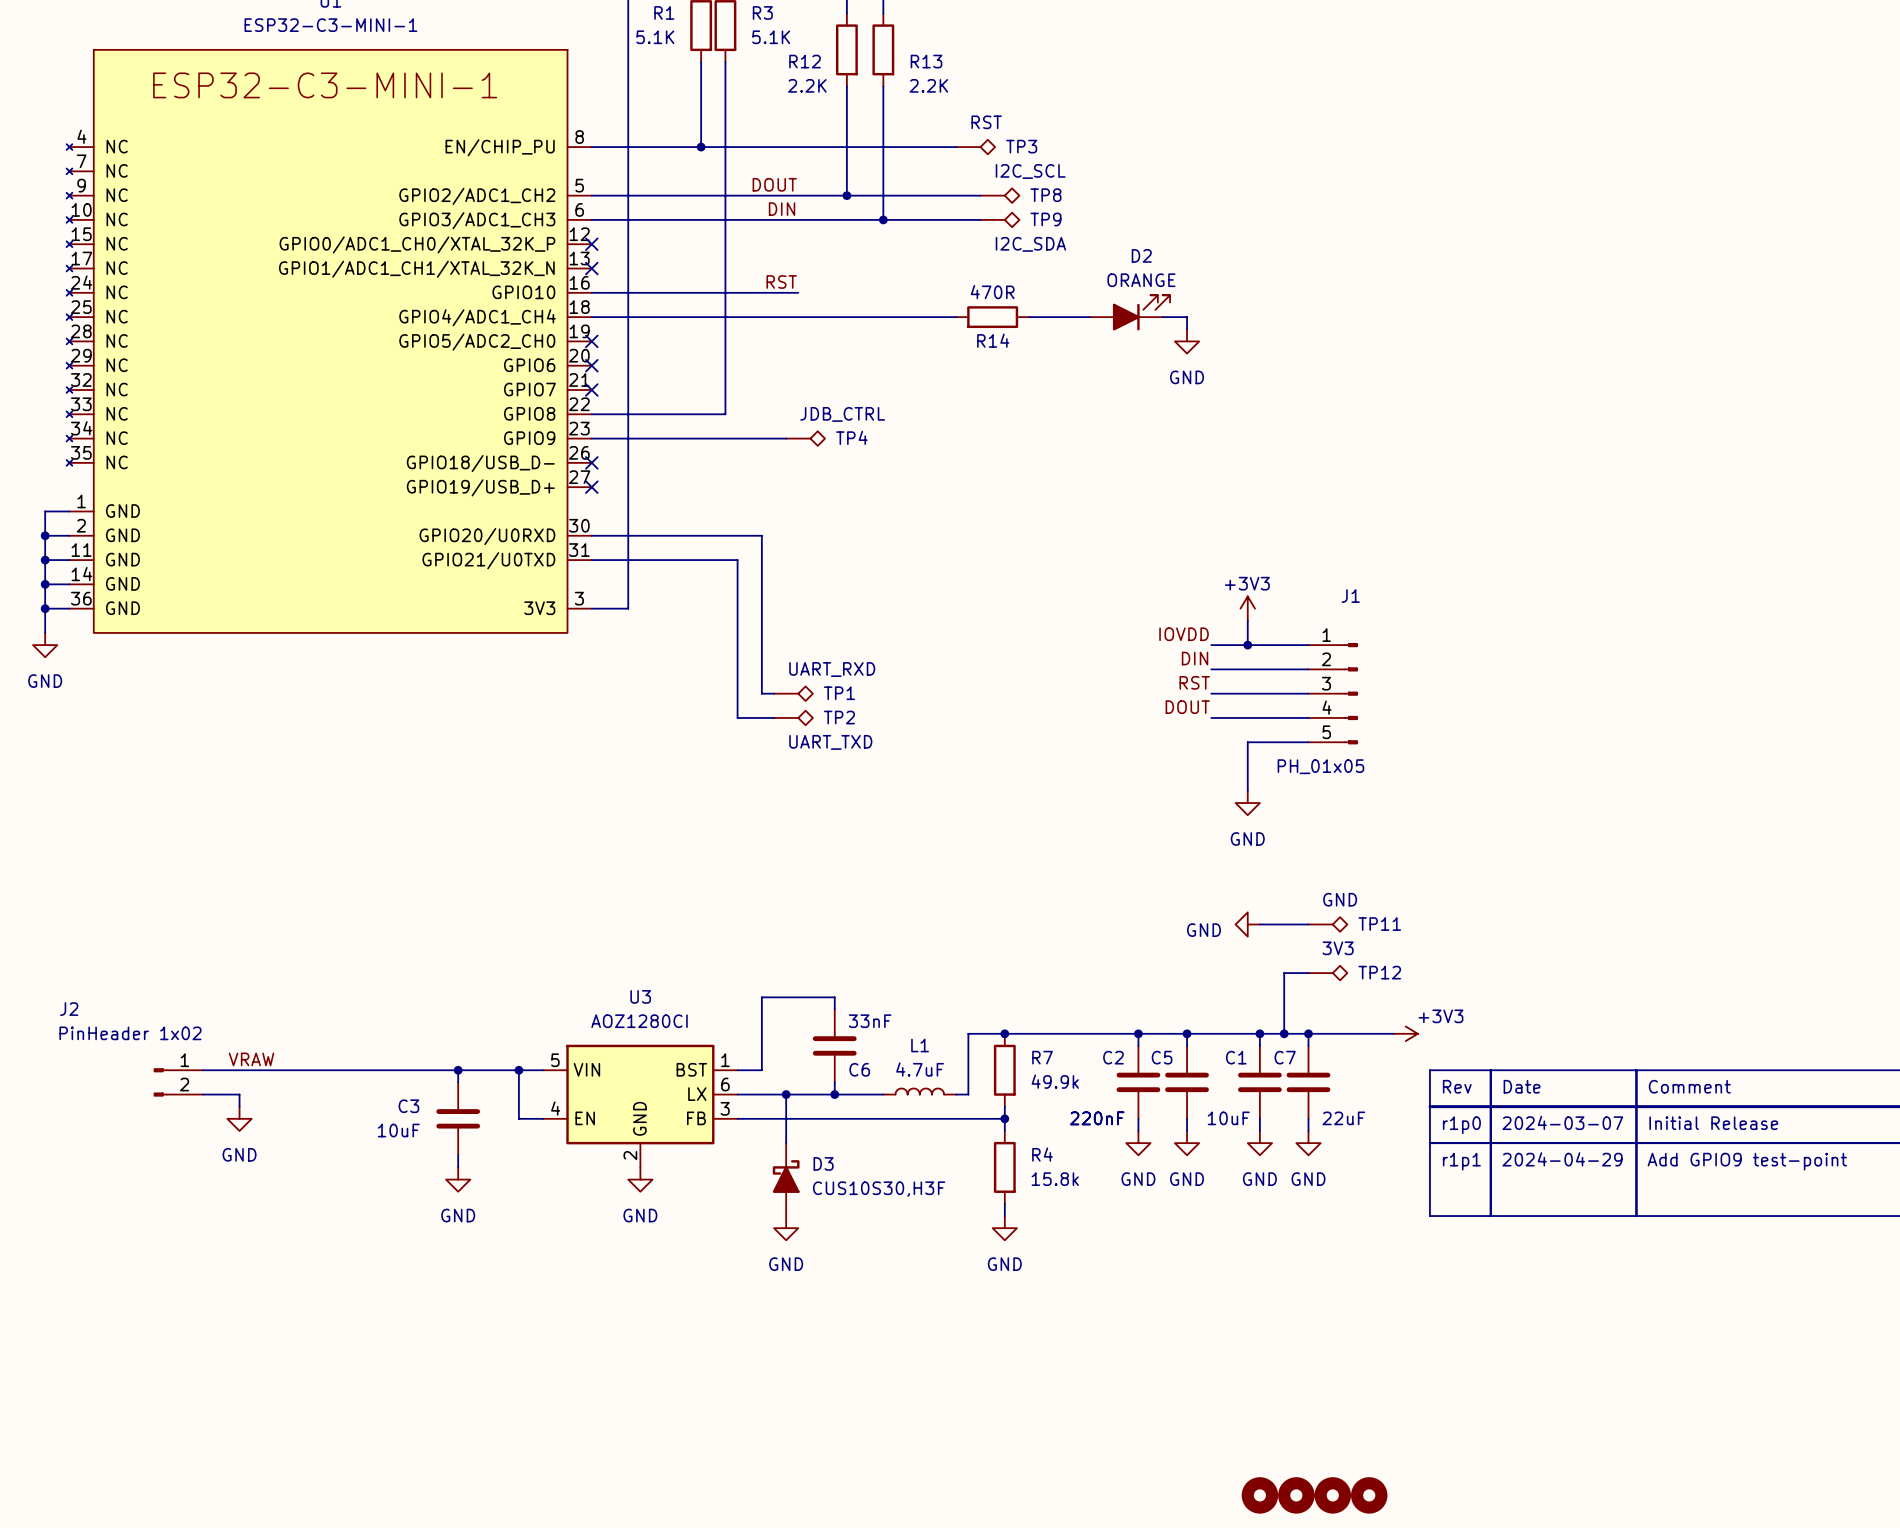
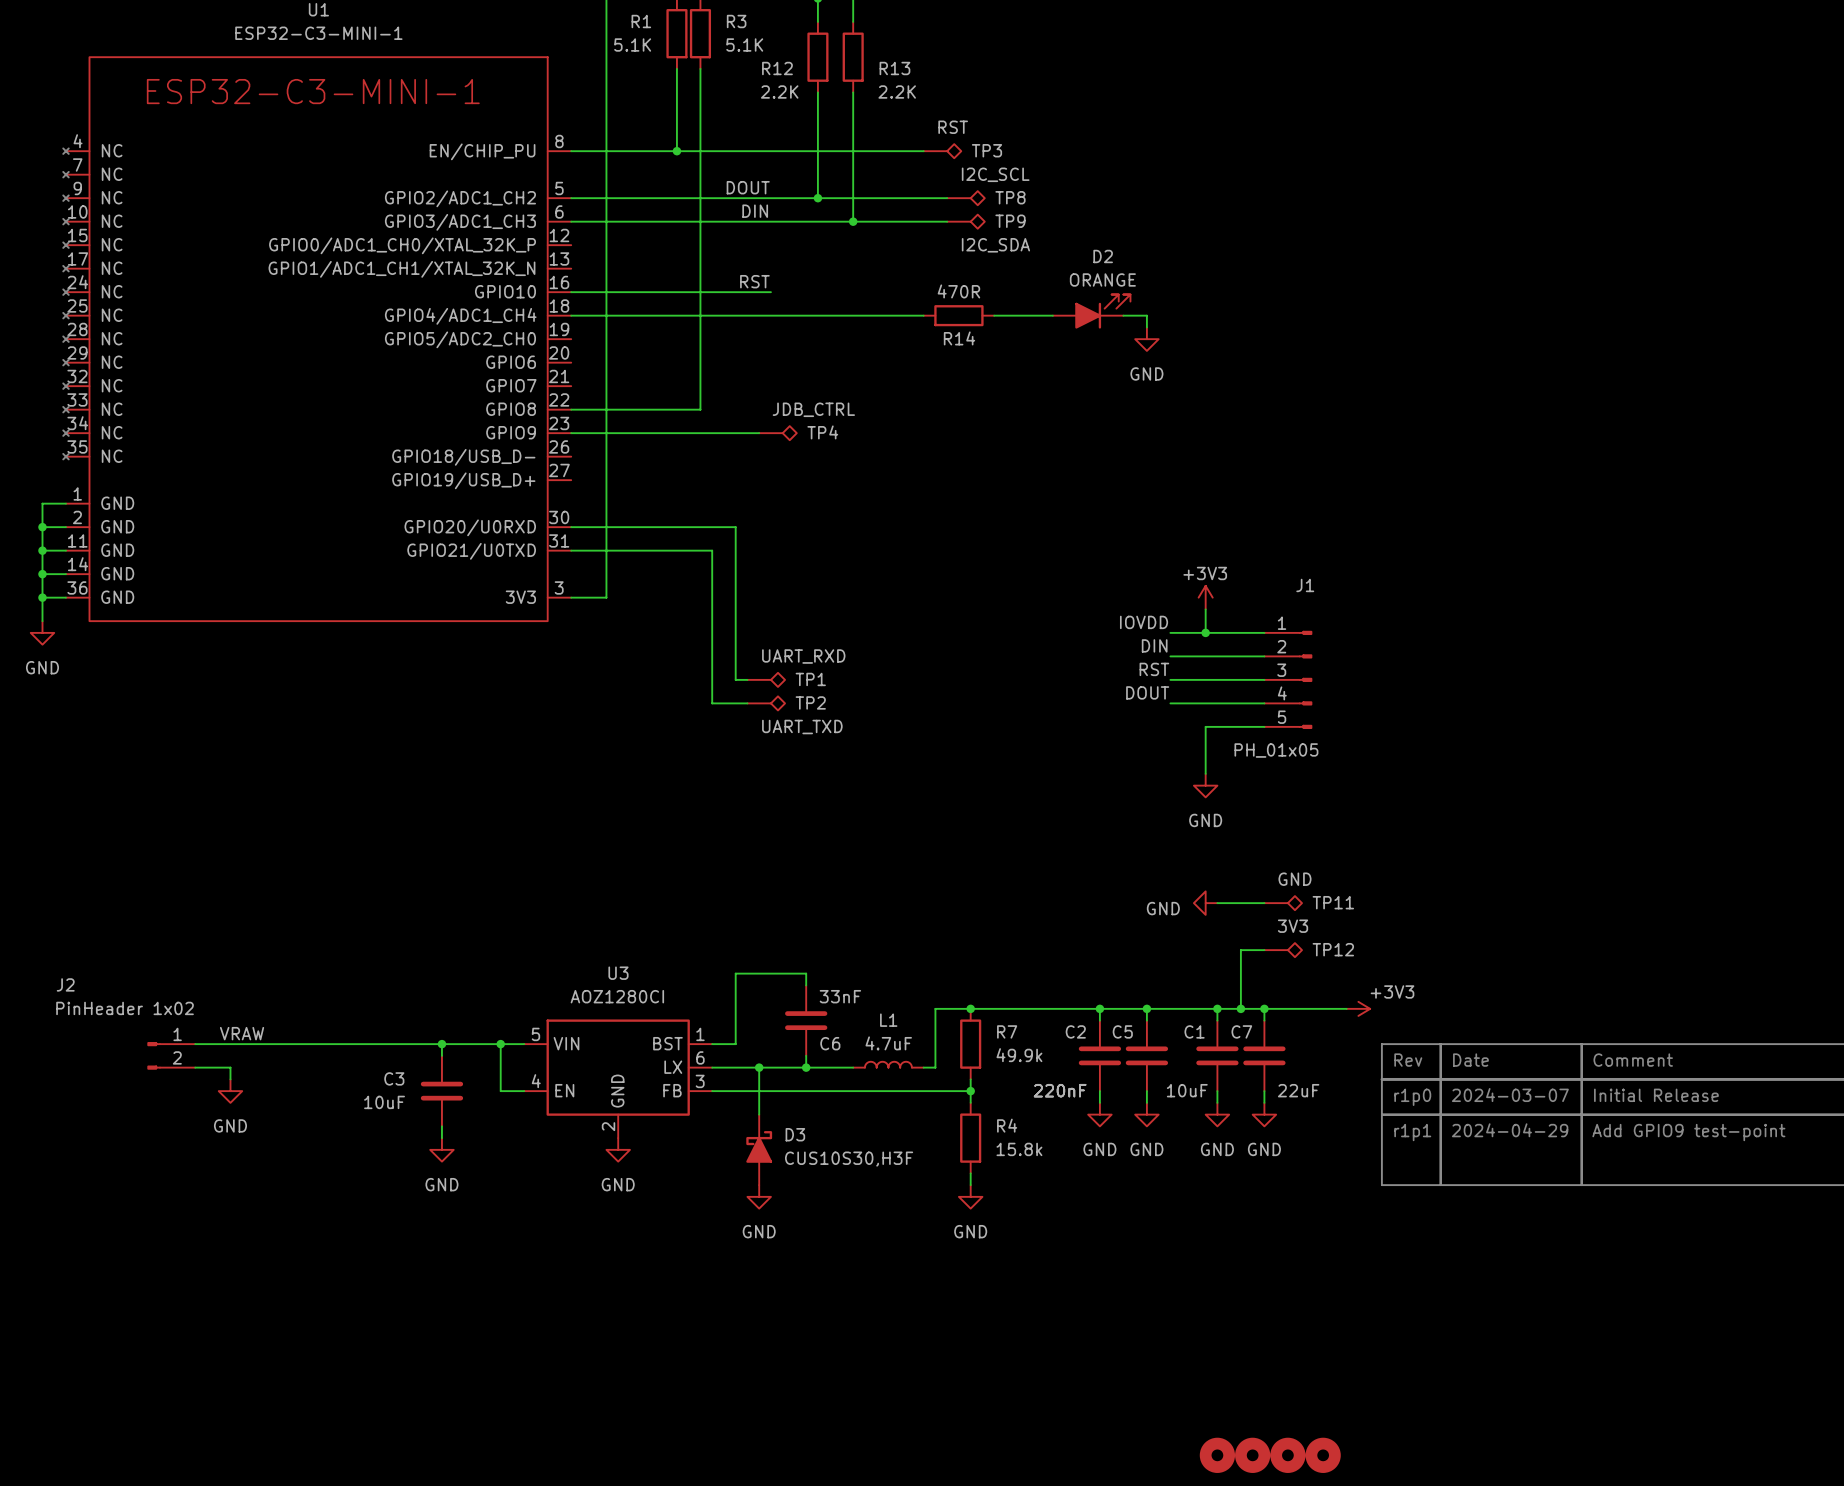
no-connect mark: (591, 244) -> none
no-connect mark: (591, 268) -> none
no-connect mark: (591, 341) -> none
no-connect mark: (591, 365) -> none
no-connect mark: (591, 390) -> none
no-connect mark: (591, 462) -> none
no-connect mark: (591, 487) -> none

